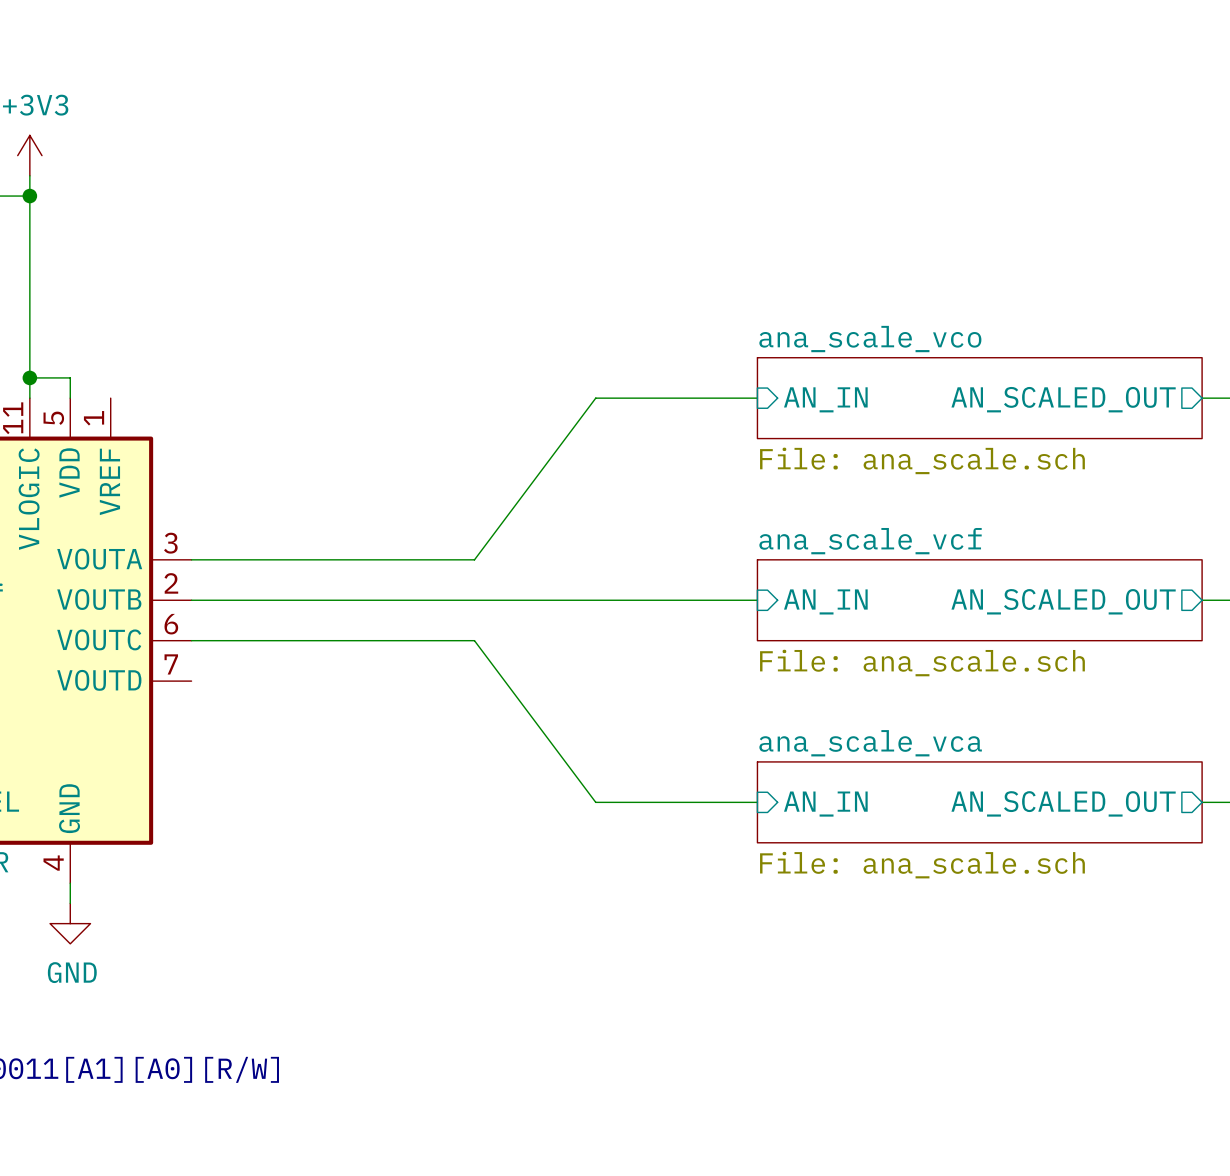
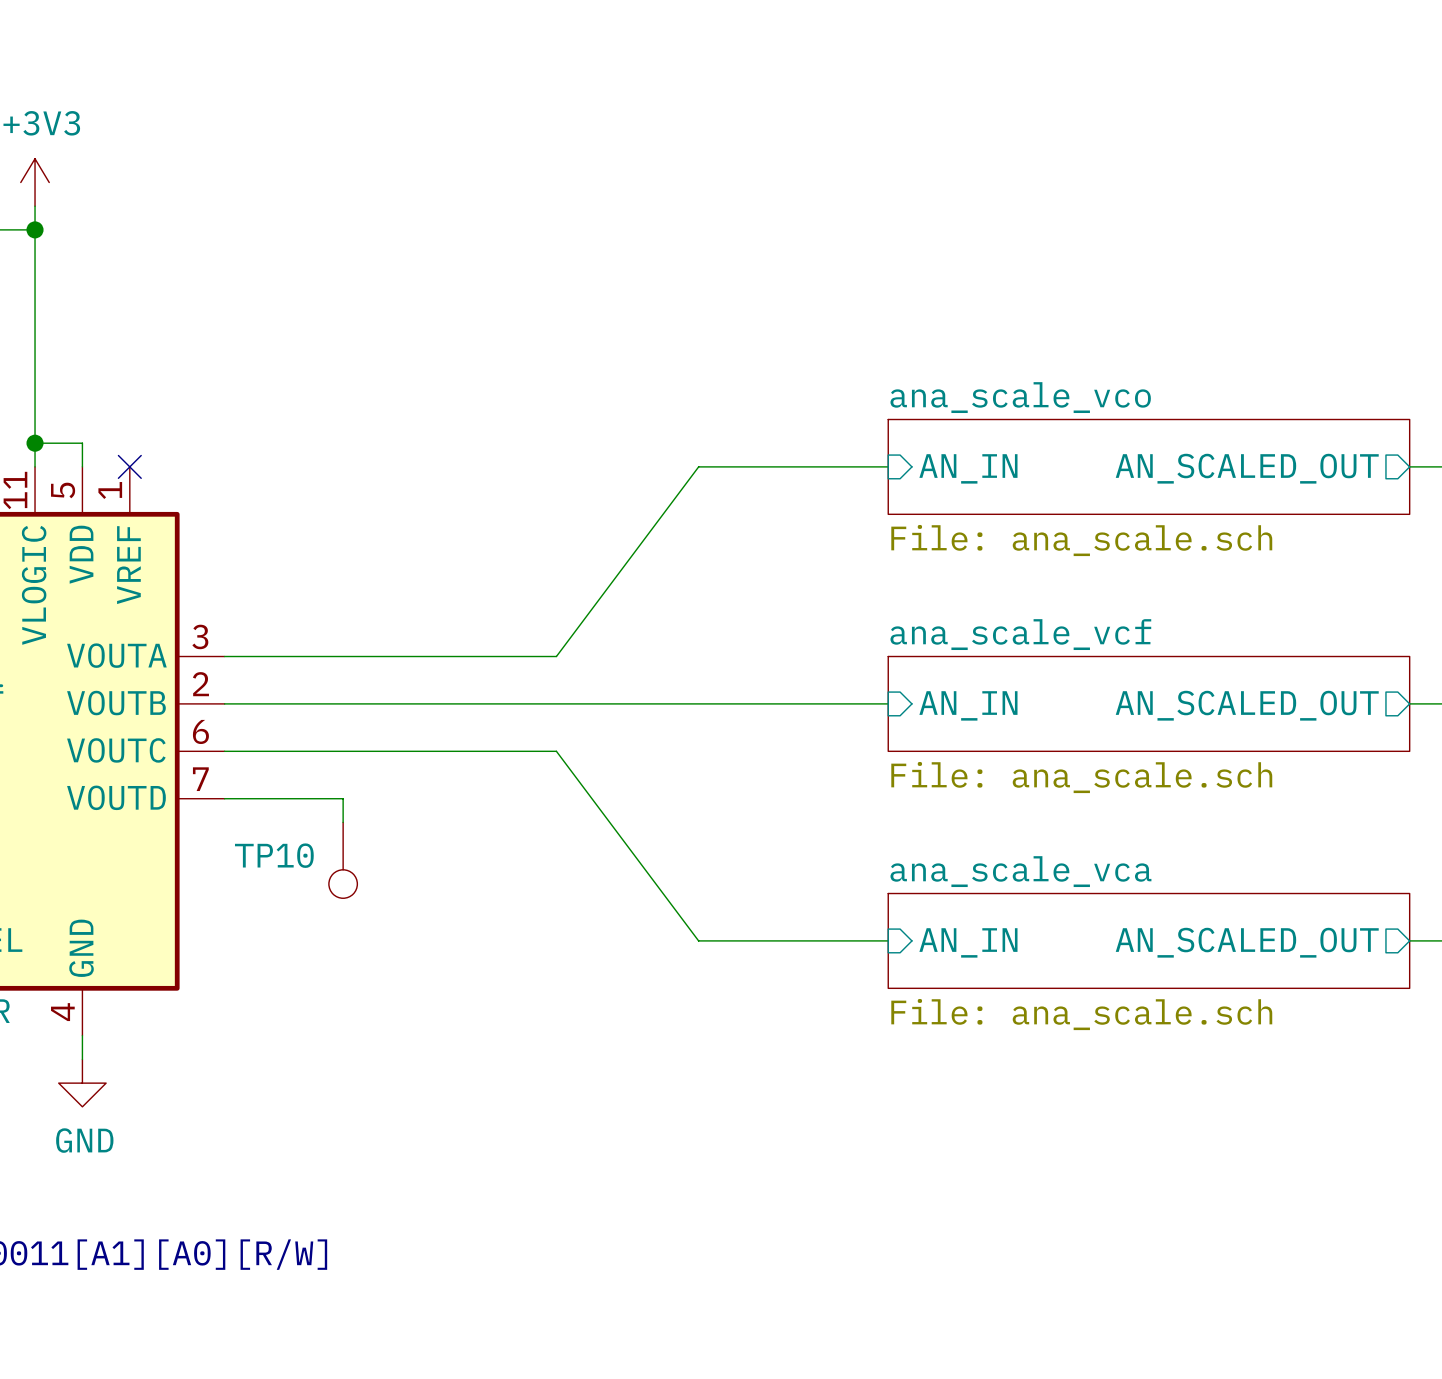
no-connect mark: none -> (129, 466)
wire: none -> (224, 798) (343, 798) (343, 822)
TP10: none -> (343, 860)

